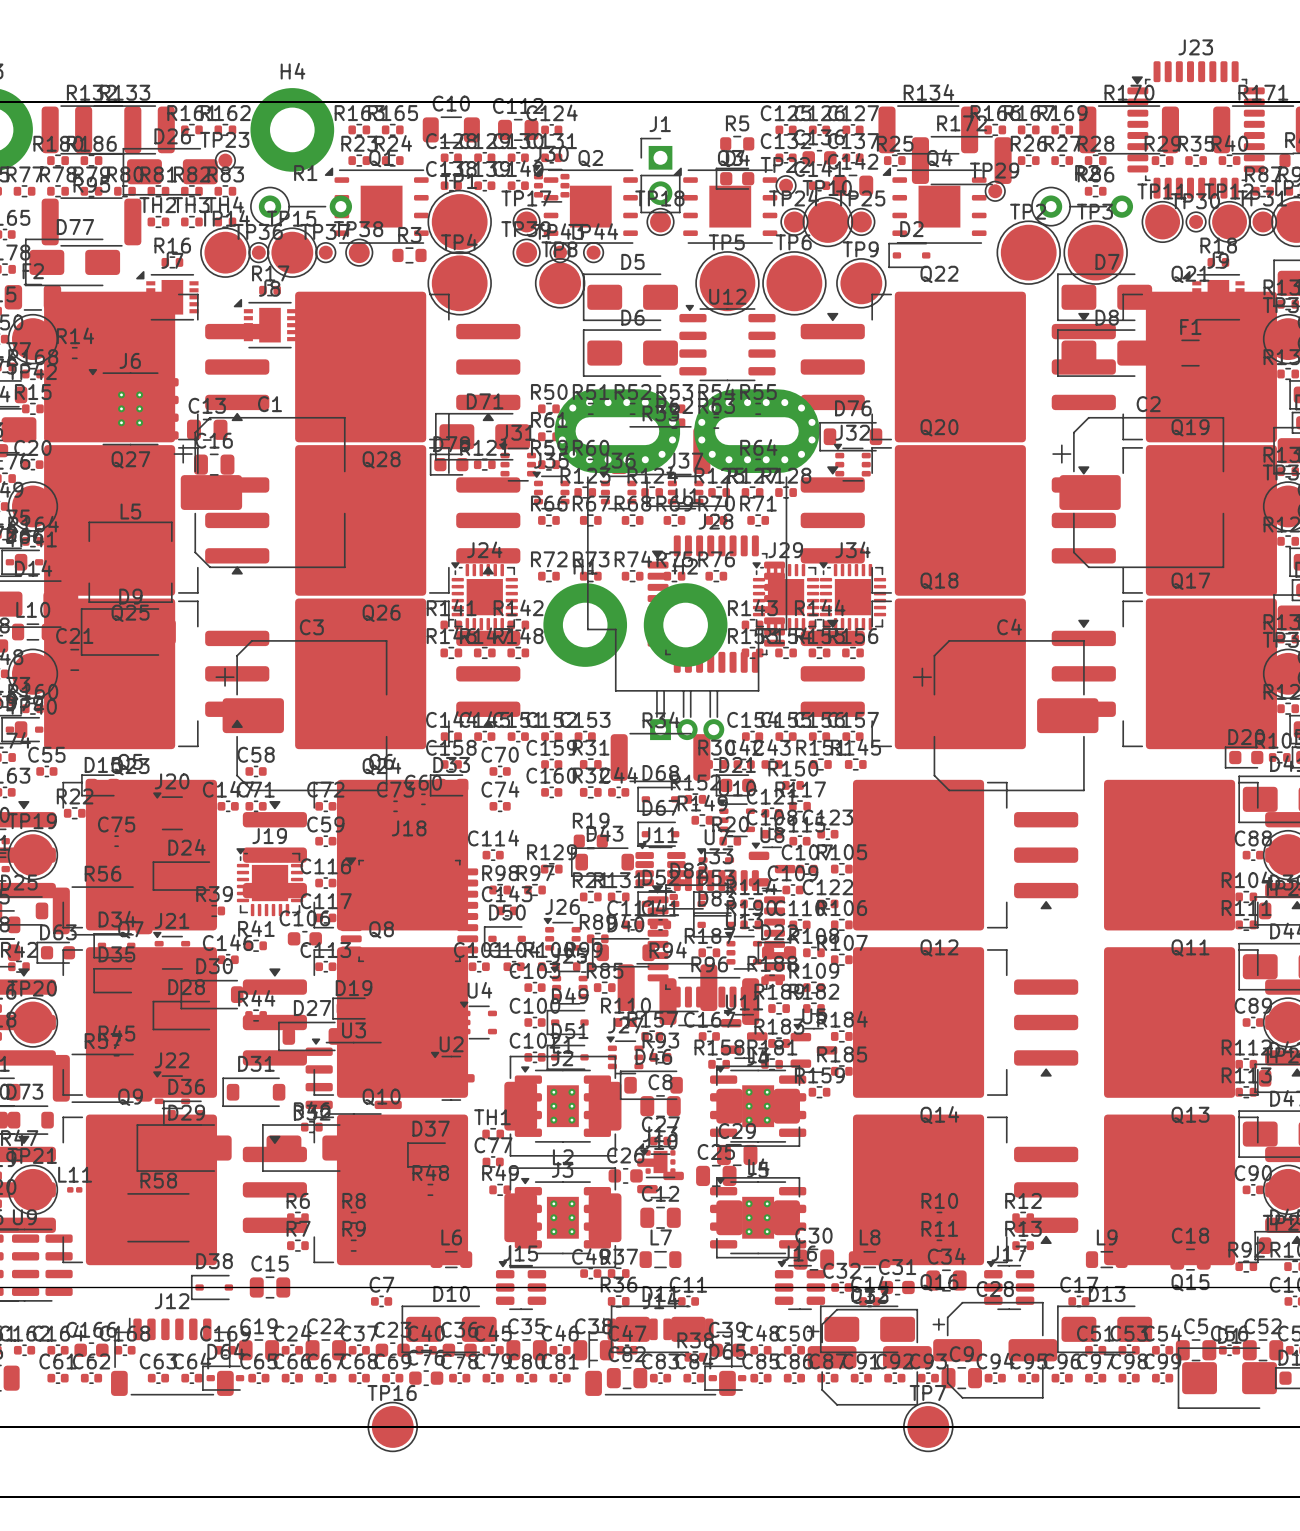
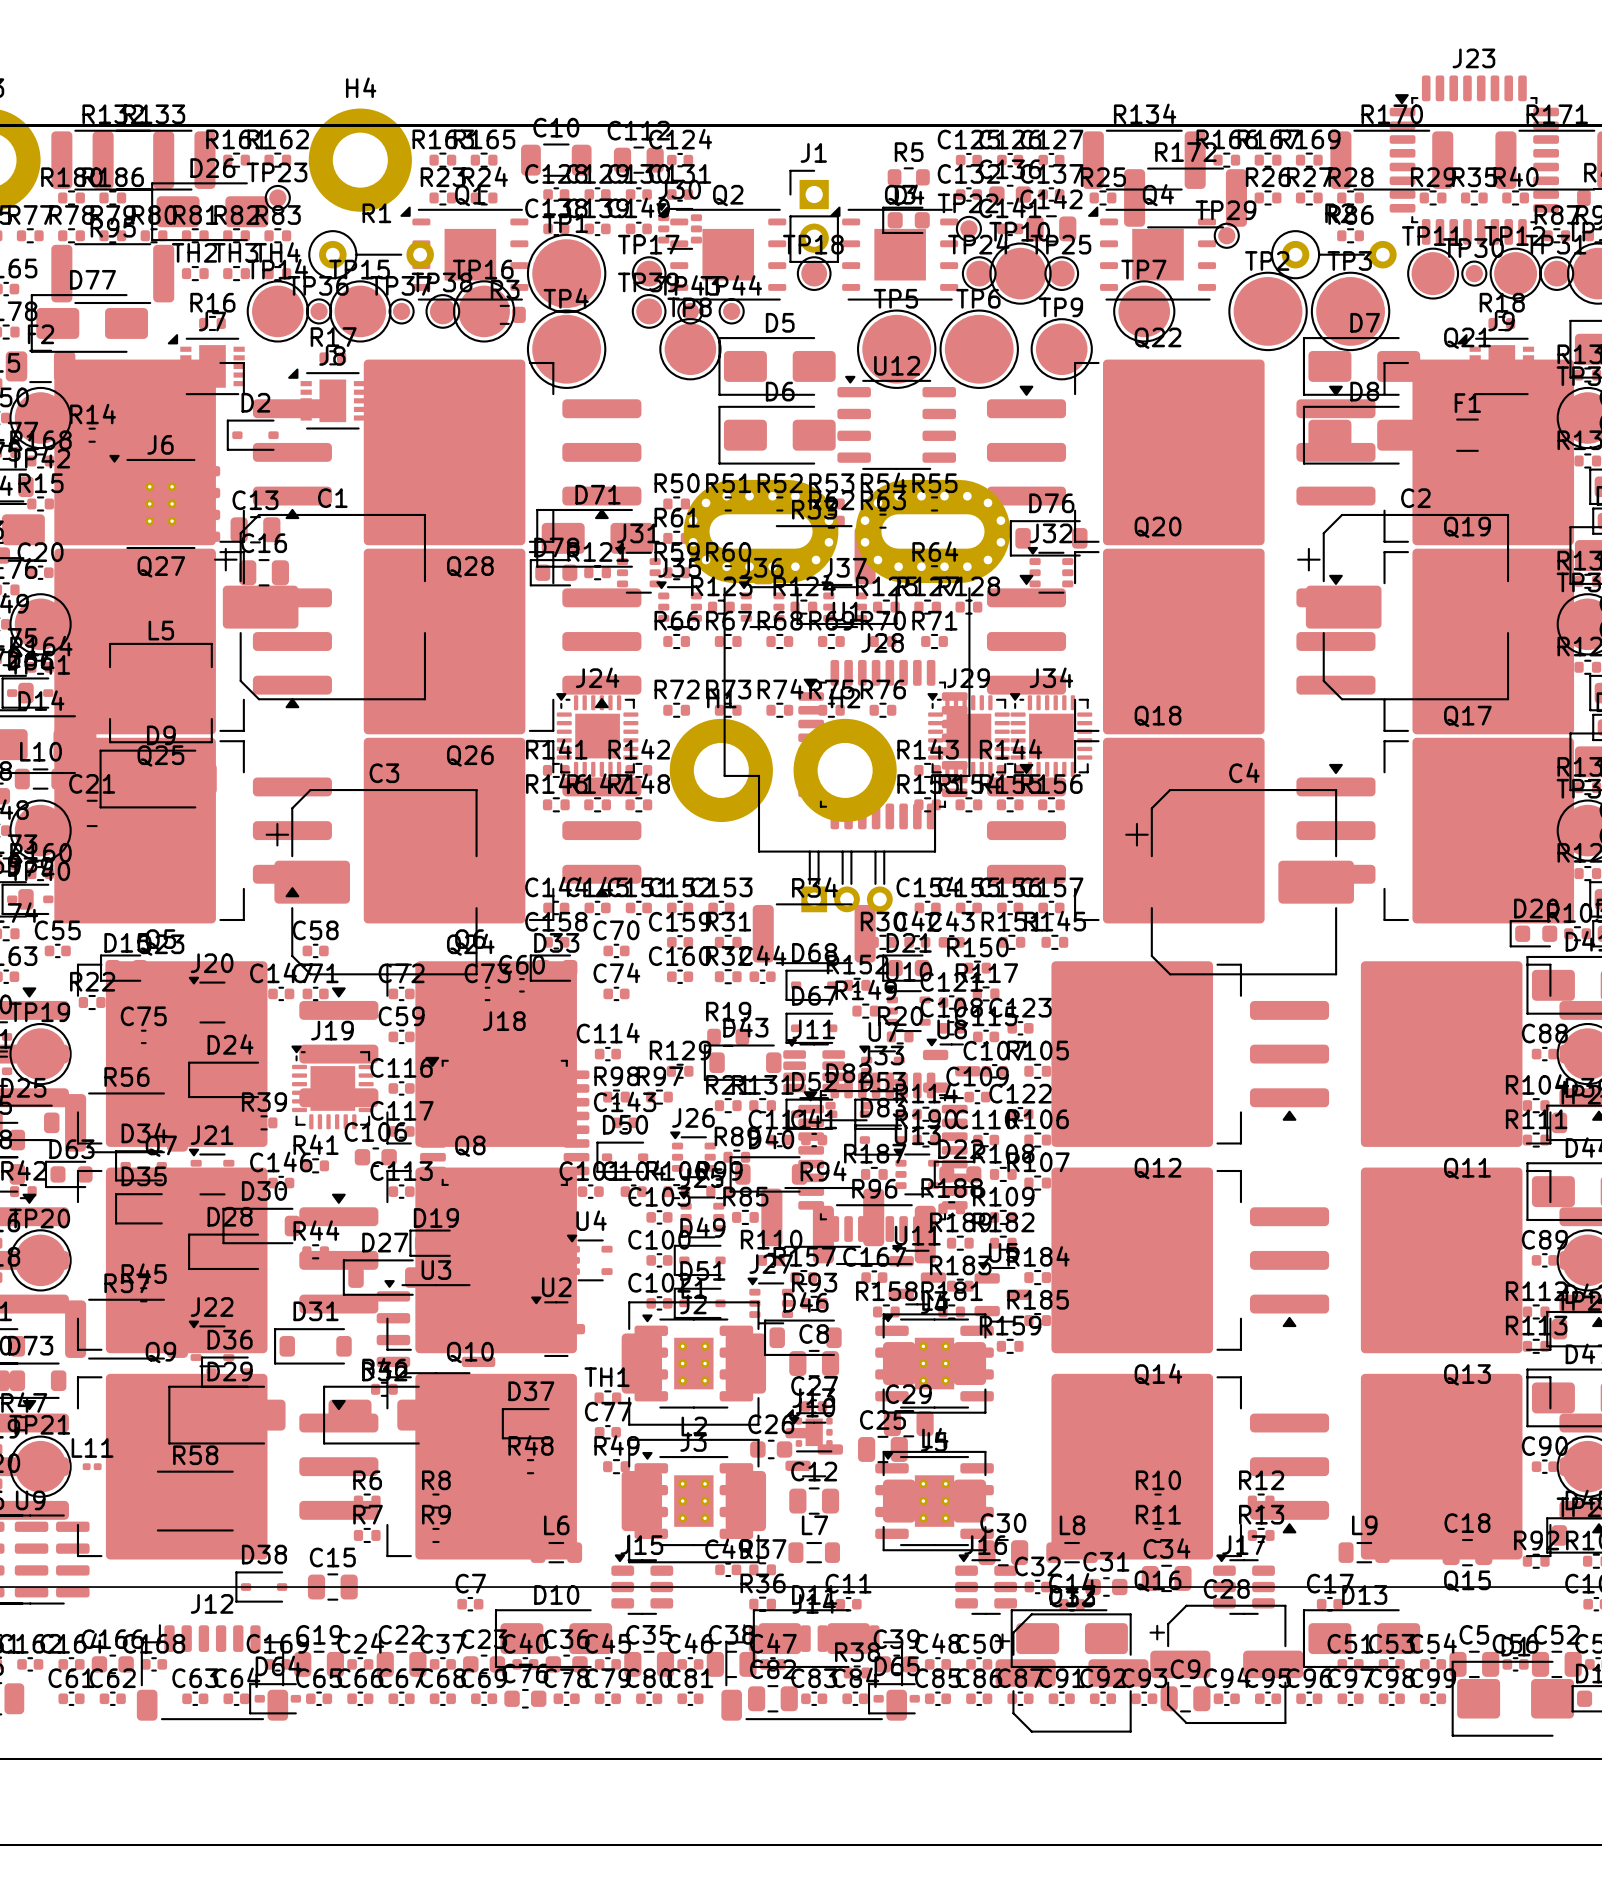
D2 position: (909, 255) -> (252, 435)
TP16 position: (392, 1426) -> (484, 311)
TP7 position: (928, 1426) -> (1144, 311)

